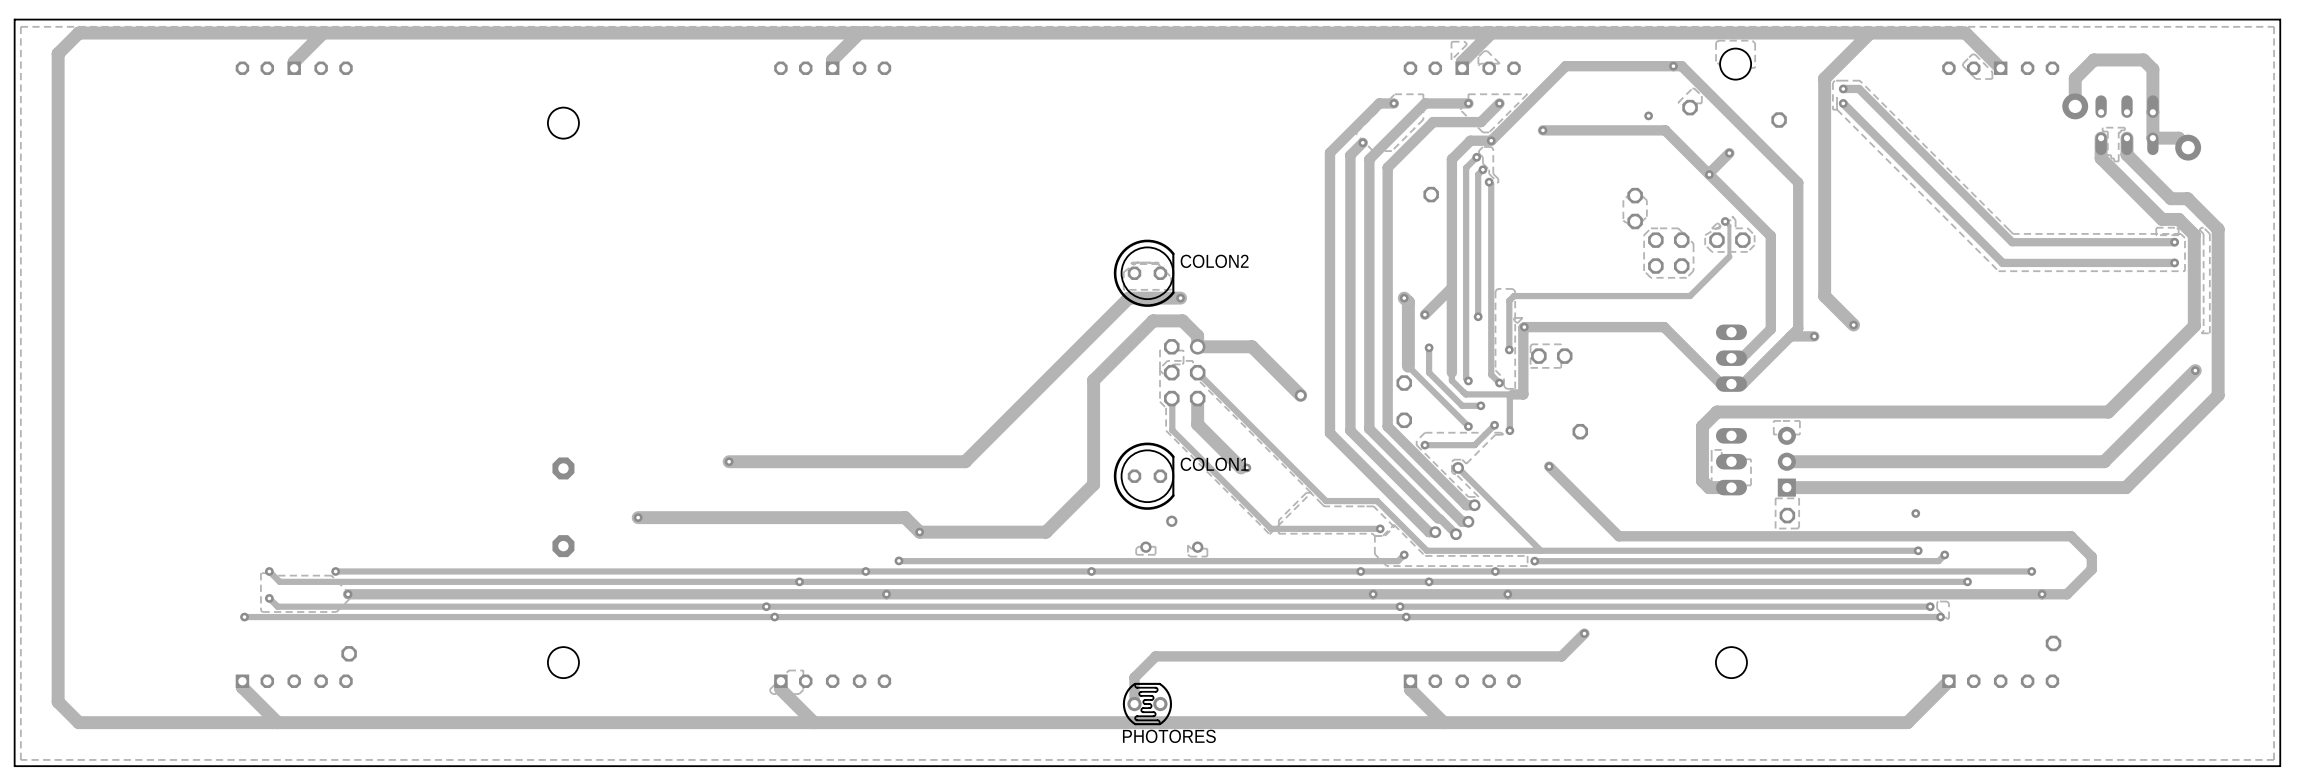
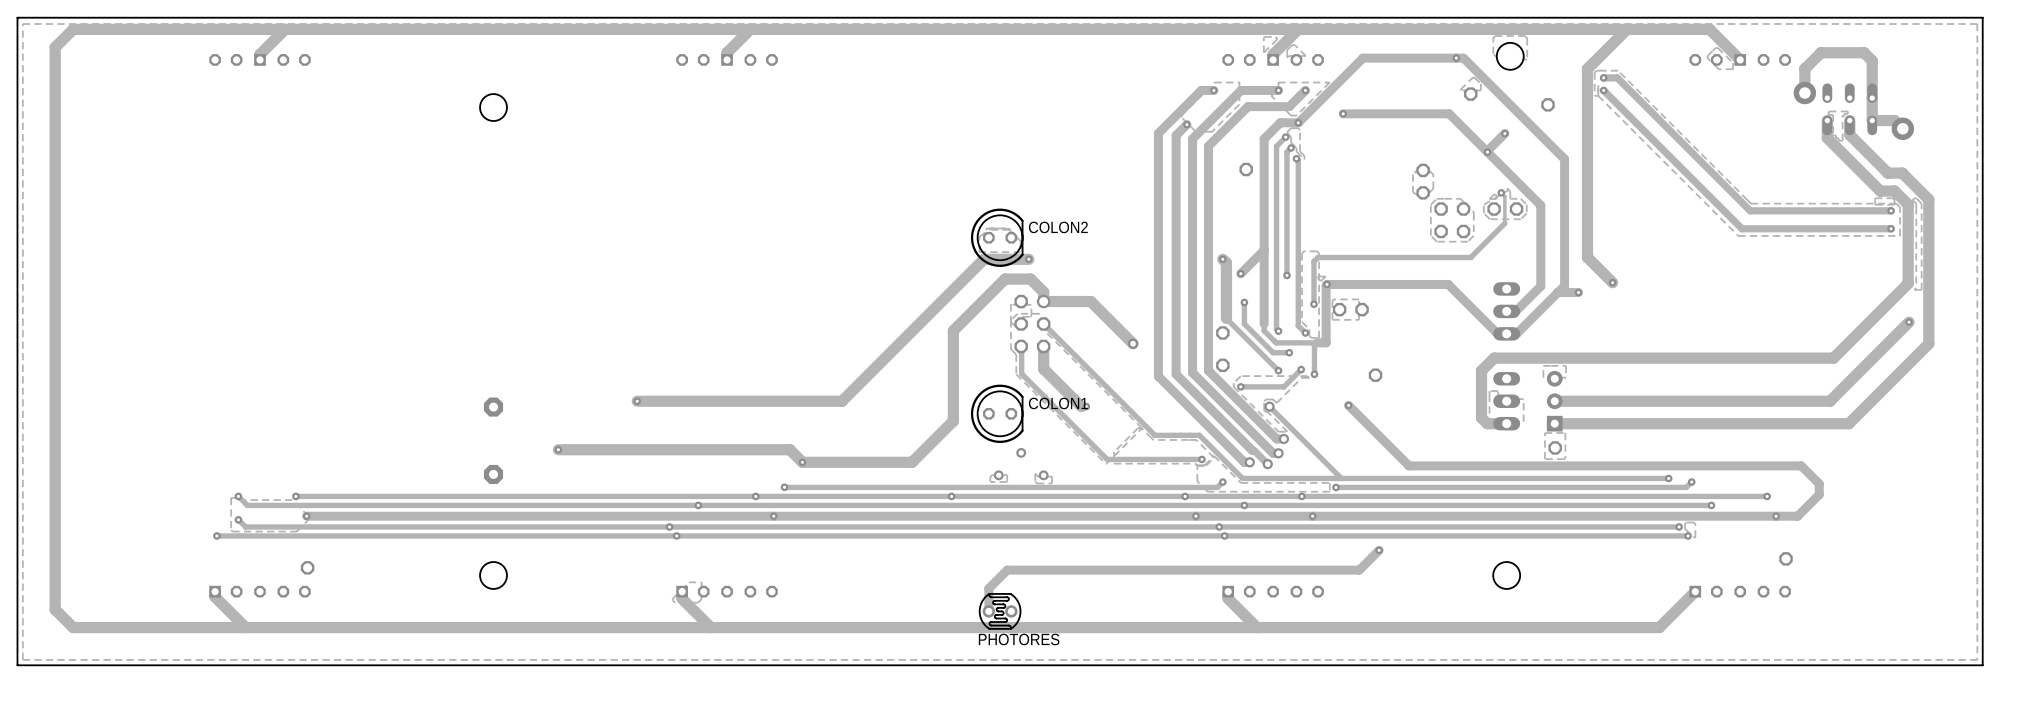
via: (1648, 115) -> none
via: (1915, 513) -> none

